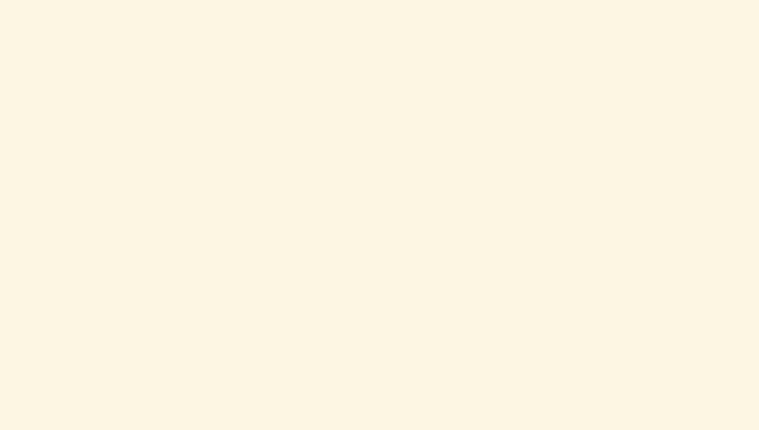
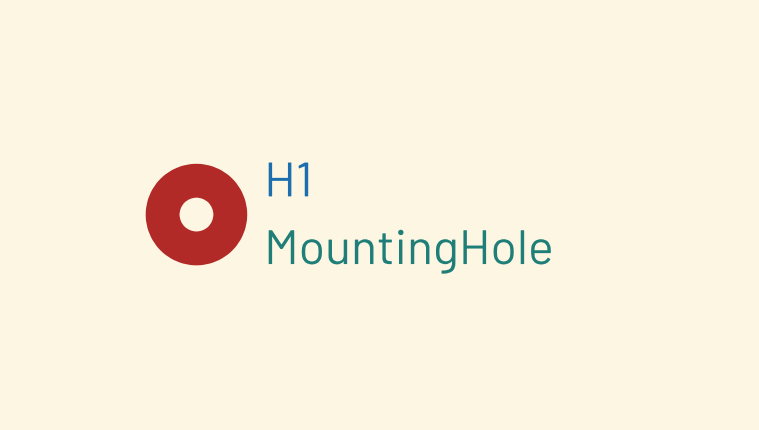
H1: none -> MountingHole (196, 214)

